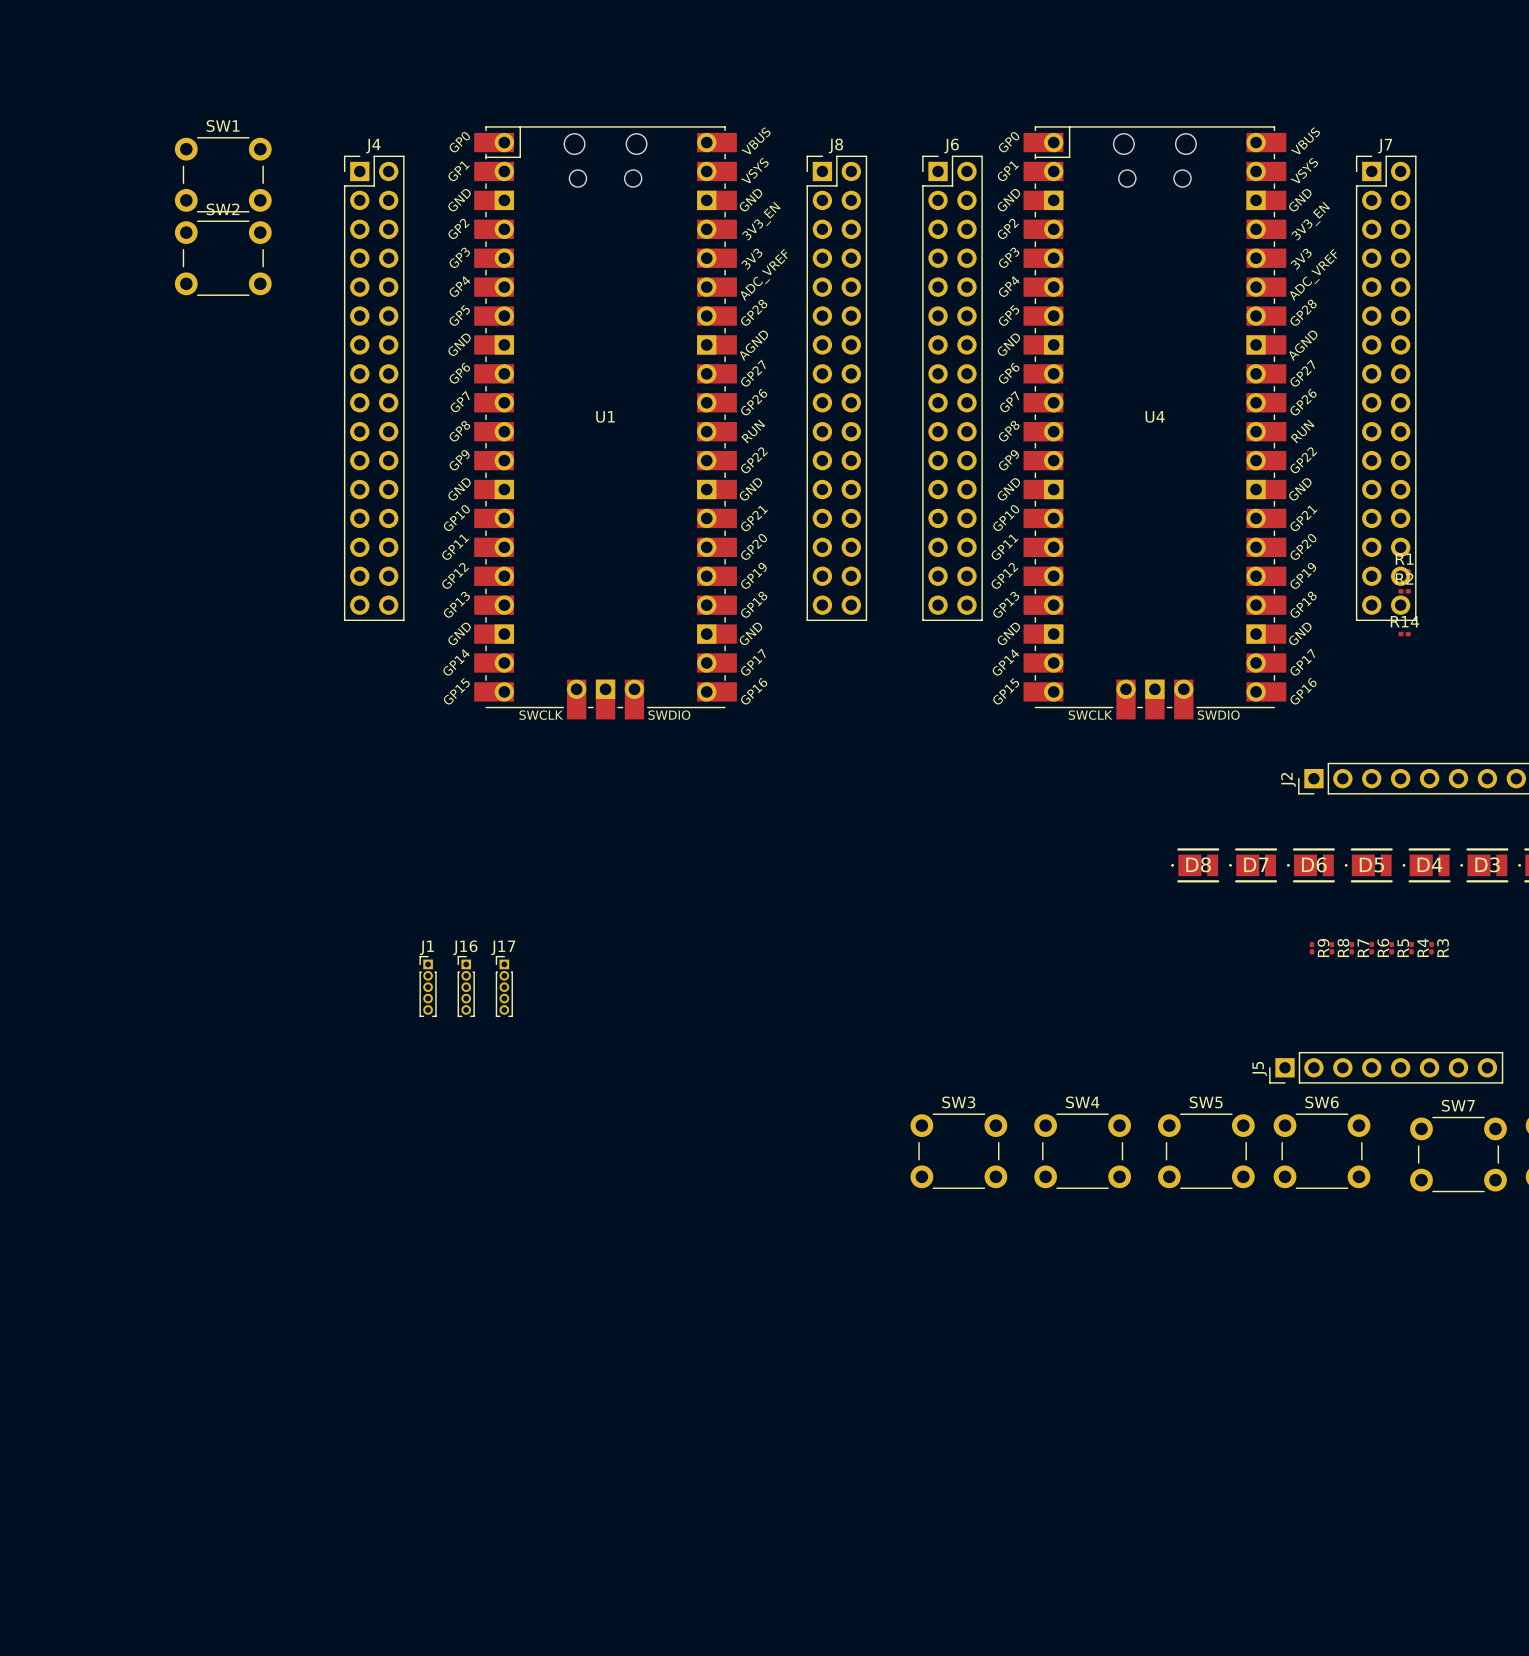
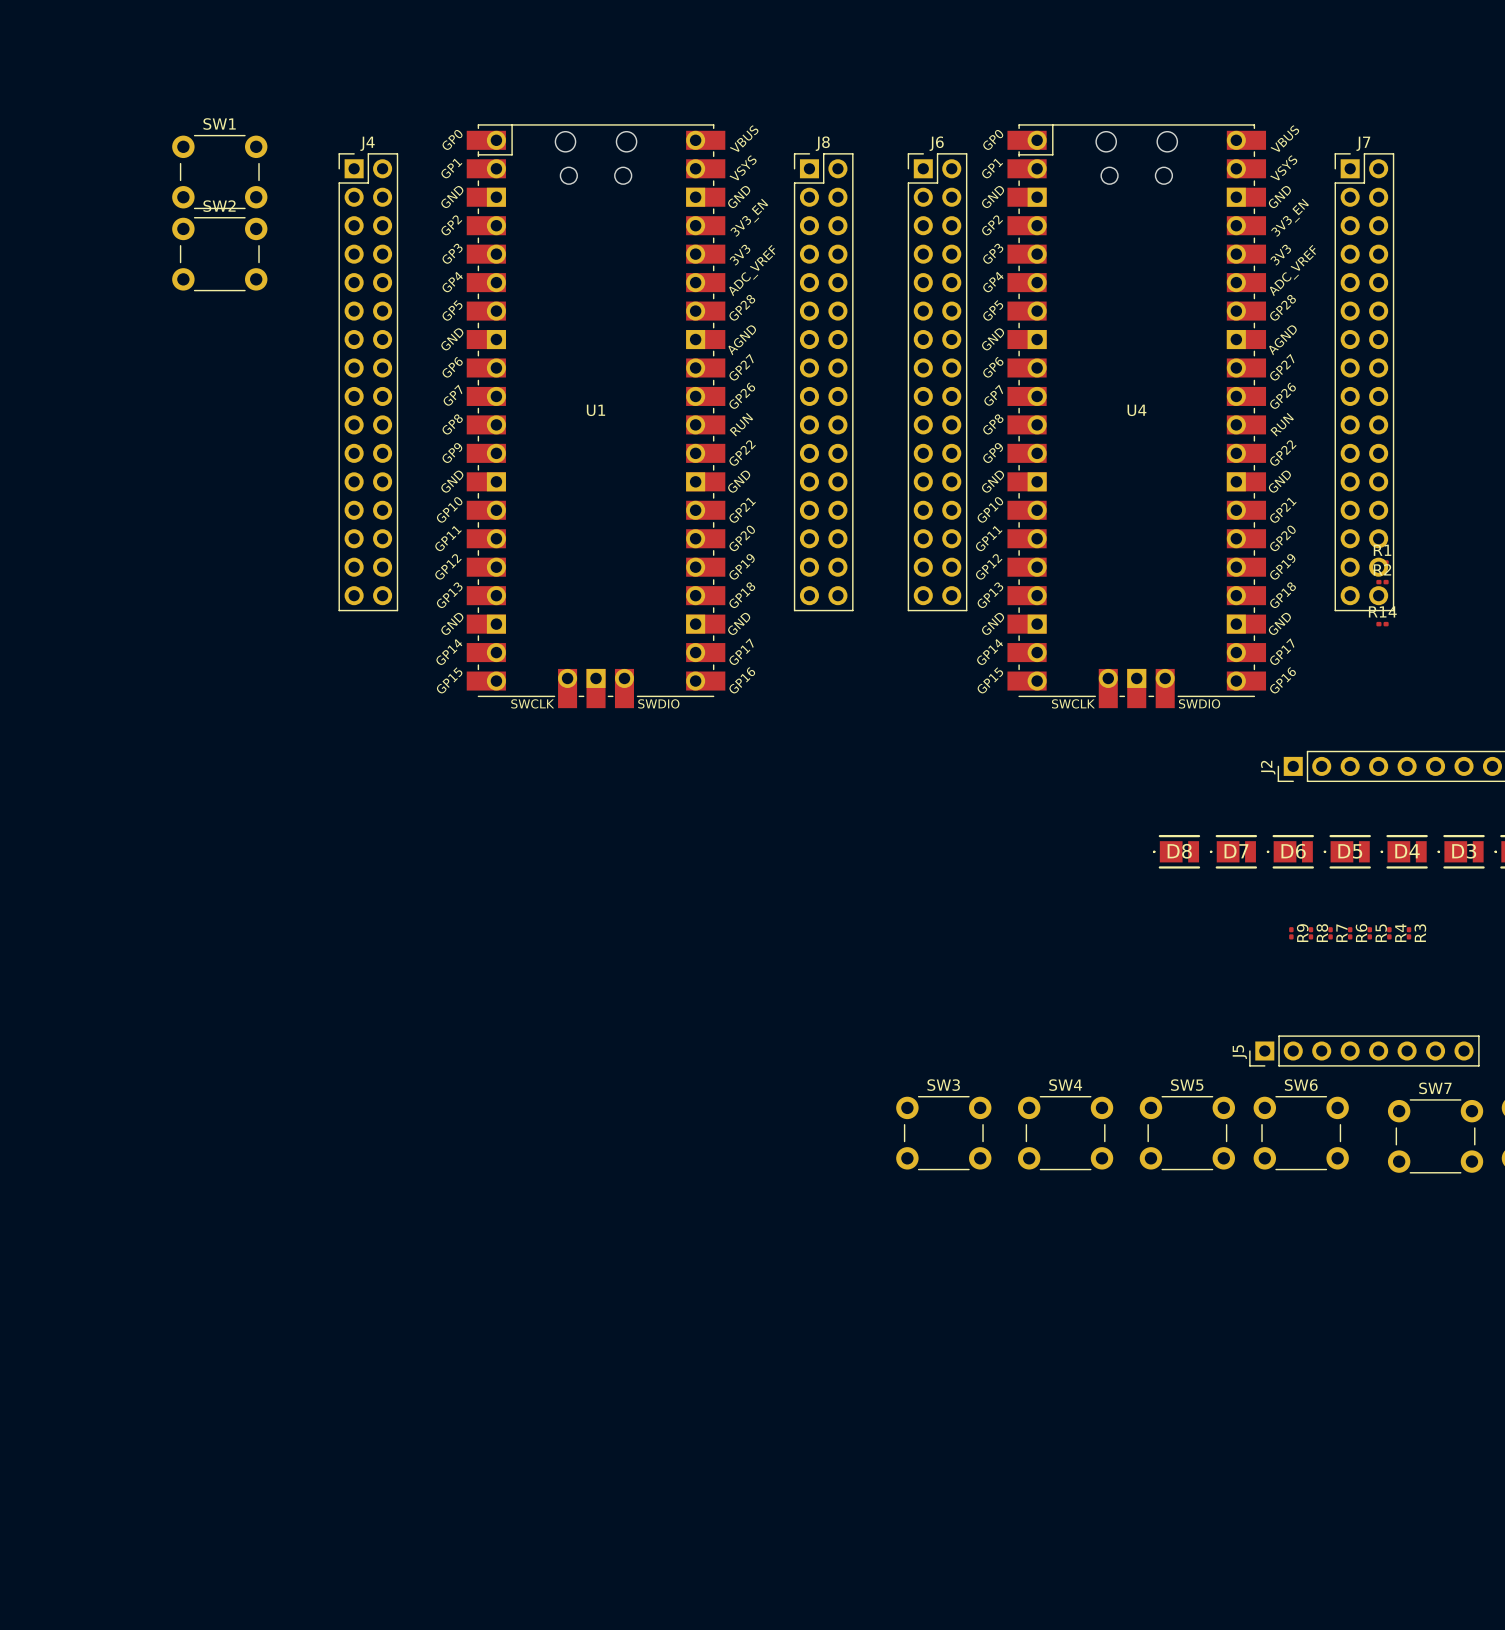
J1: (428, 986) -> none
J16: (466, 986) -> none
J17: (504, 986) -> none

